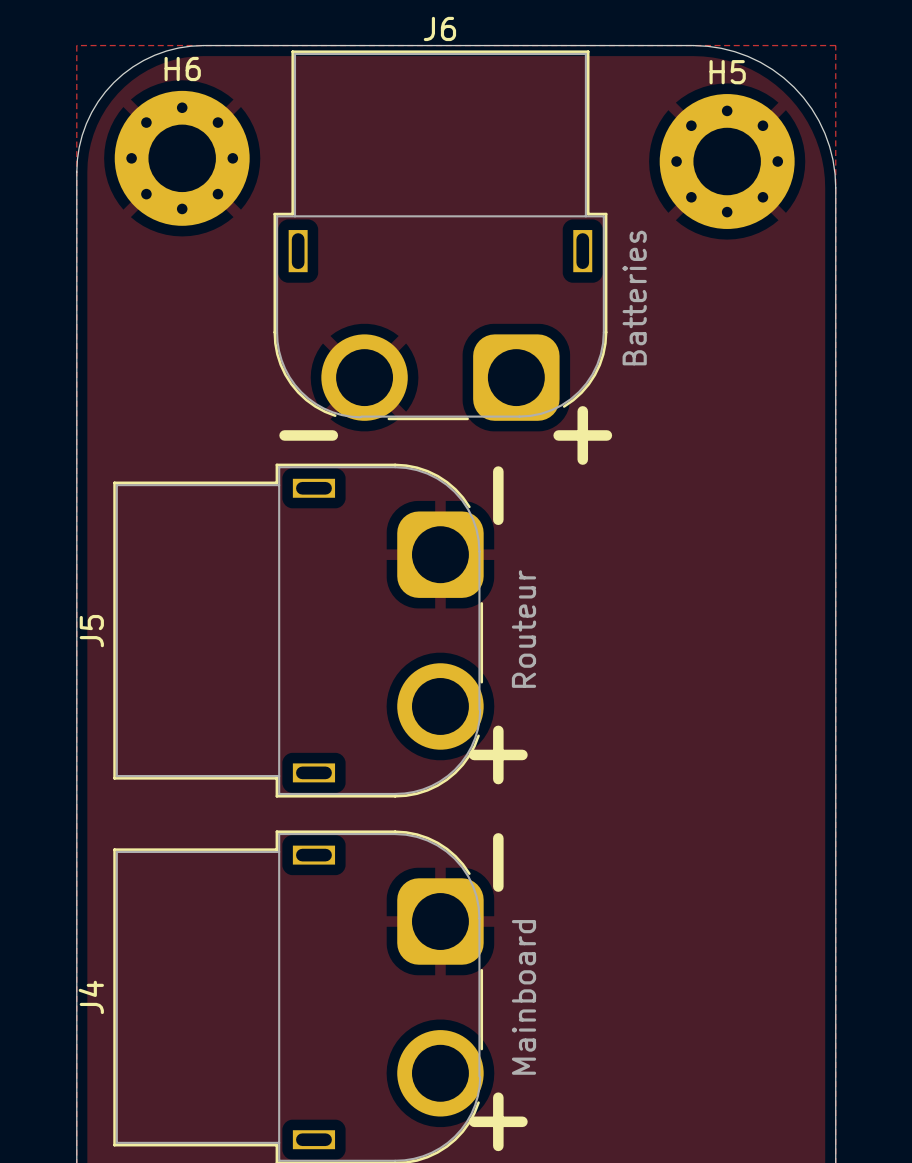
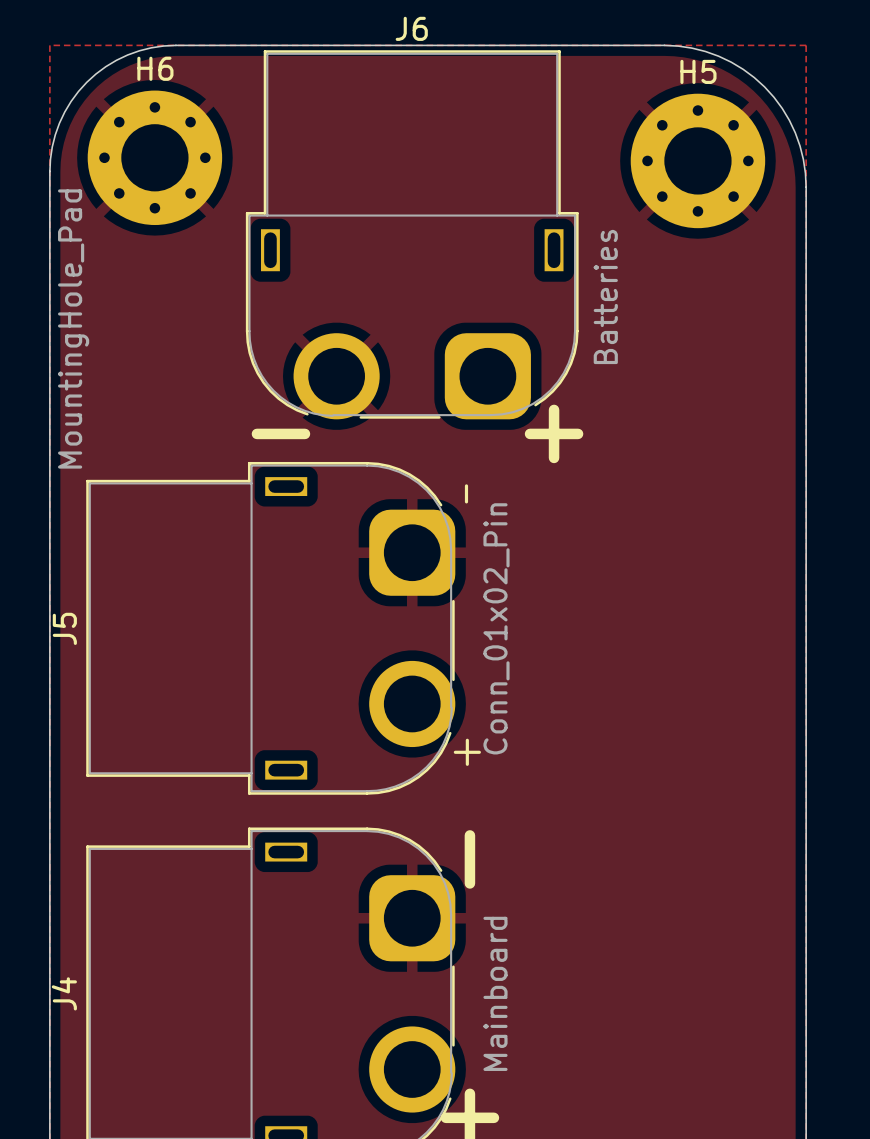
H6 value: none -> MountingHole_Pad (73, 328)
J5 footprint: [113, 463, 484, 798] -> [86, 461, 456, 795]
J5 value: Routeur (523, 629) -> Conn_01x02_Pin (496, 628)

